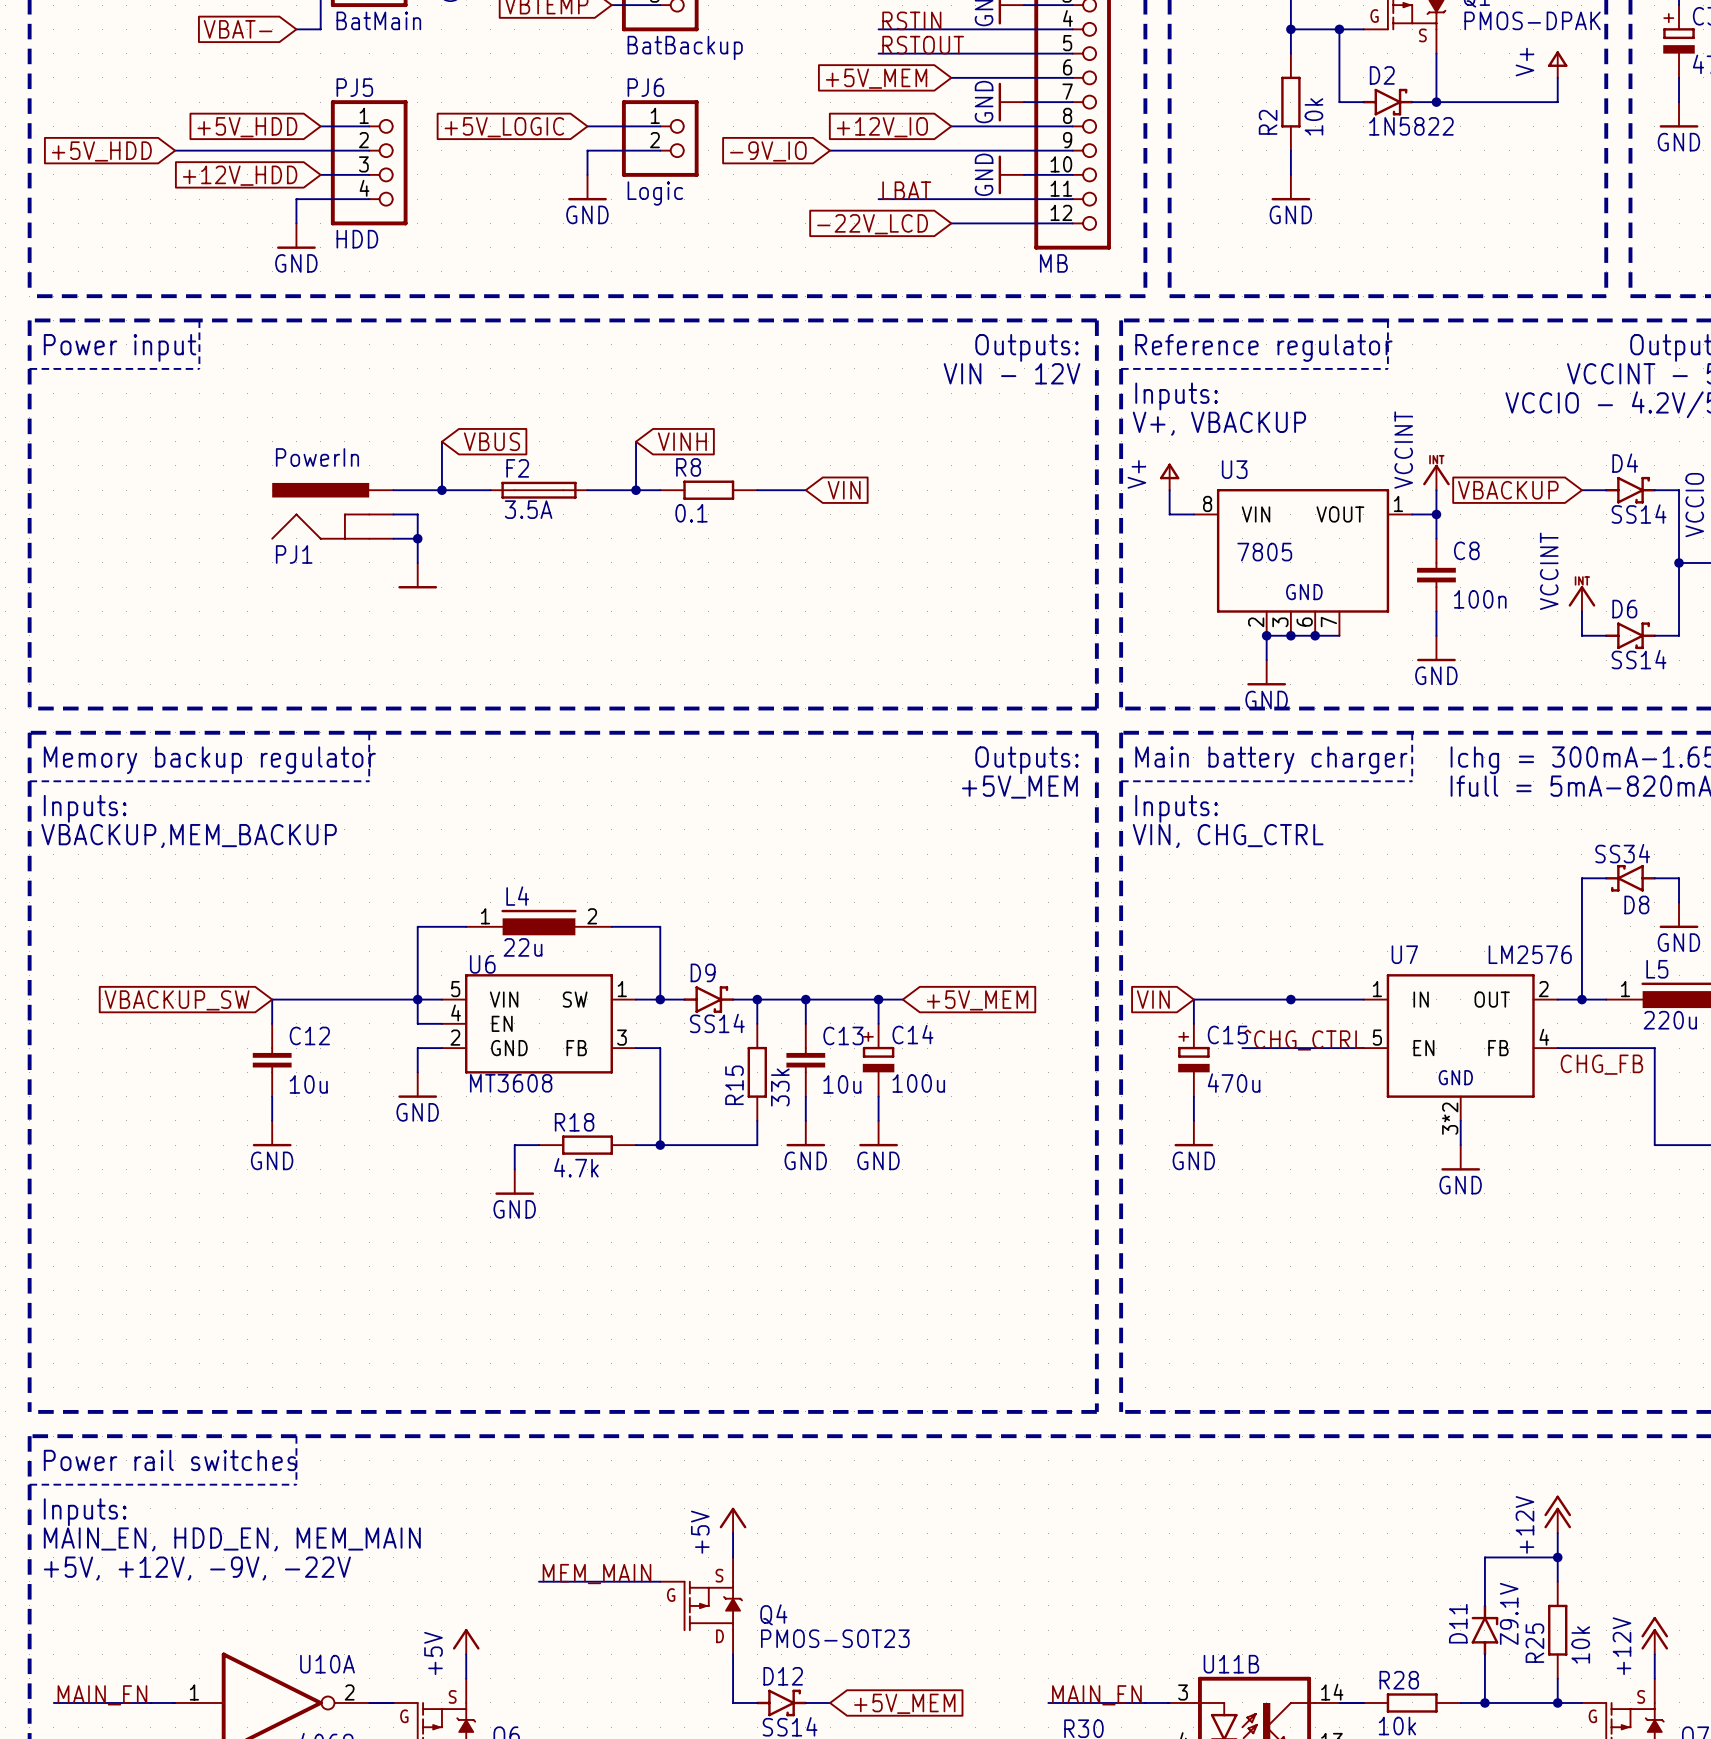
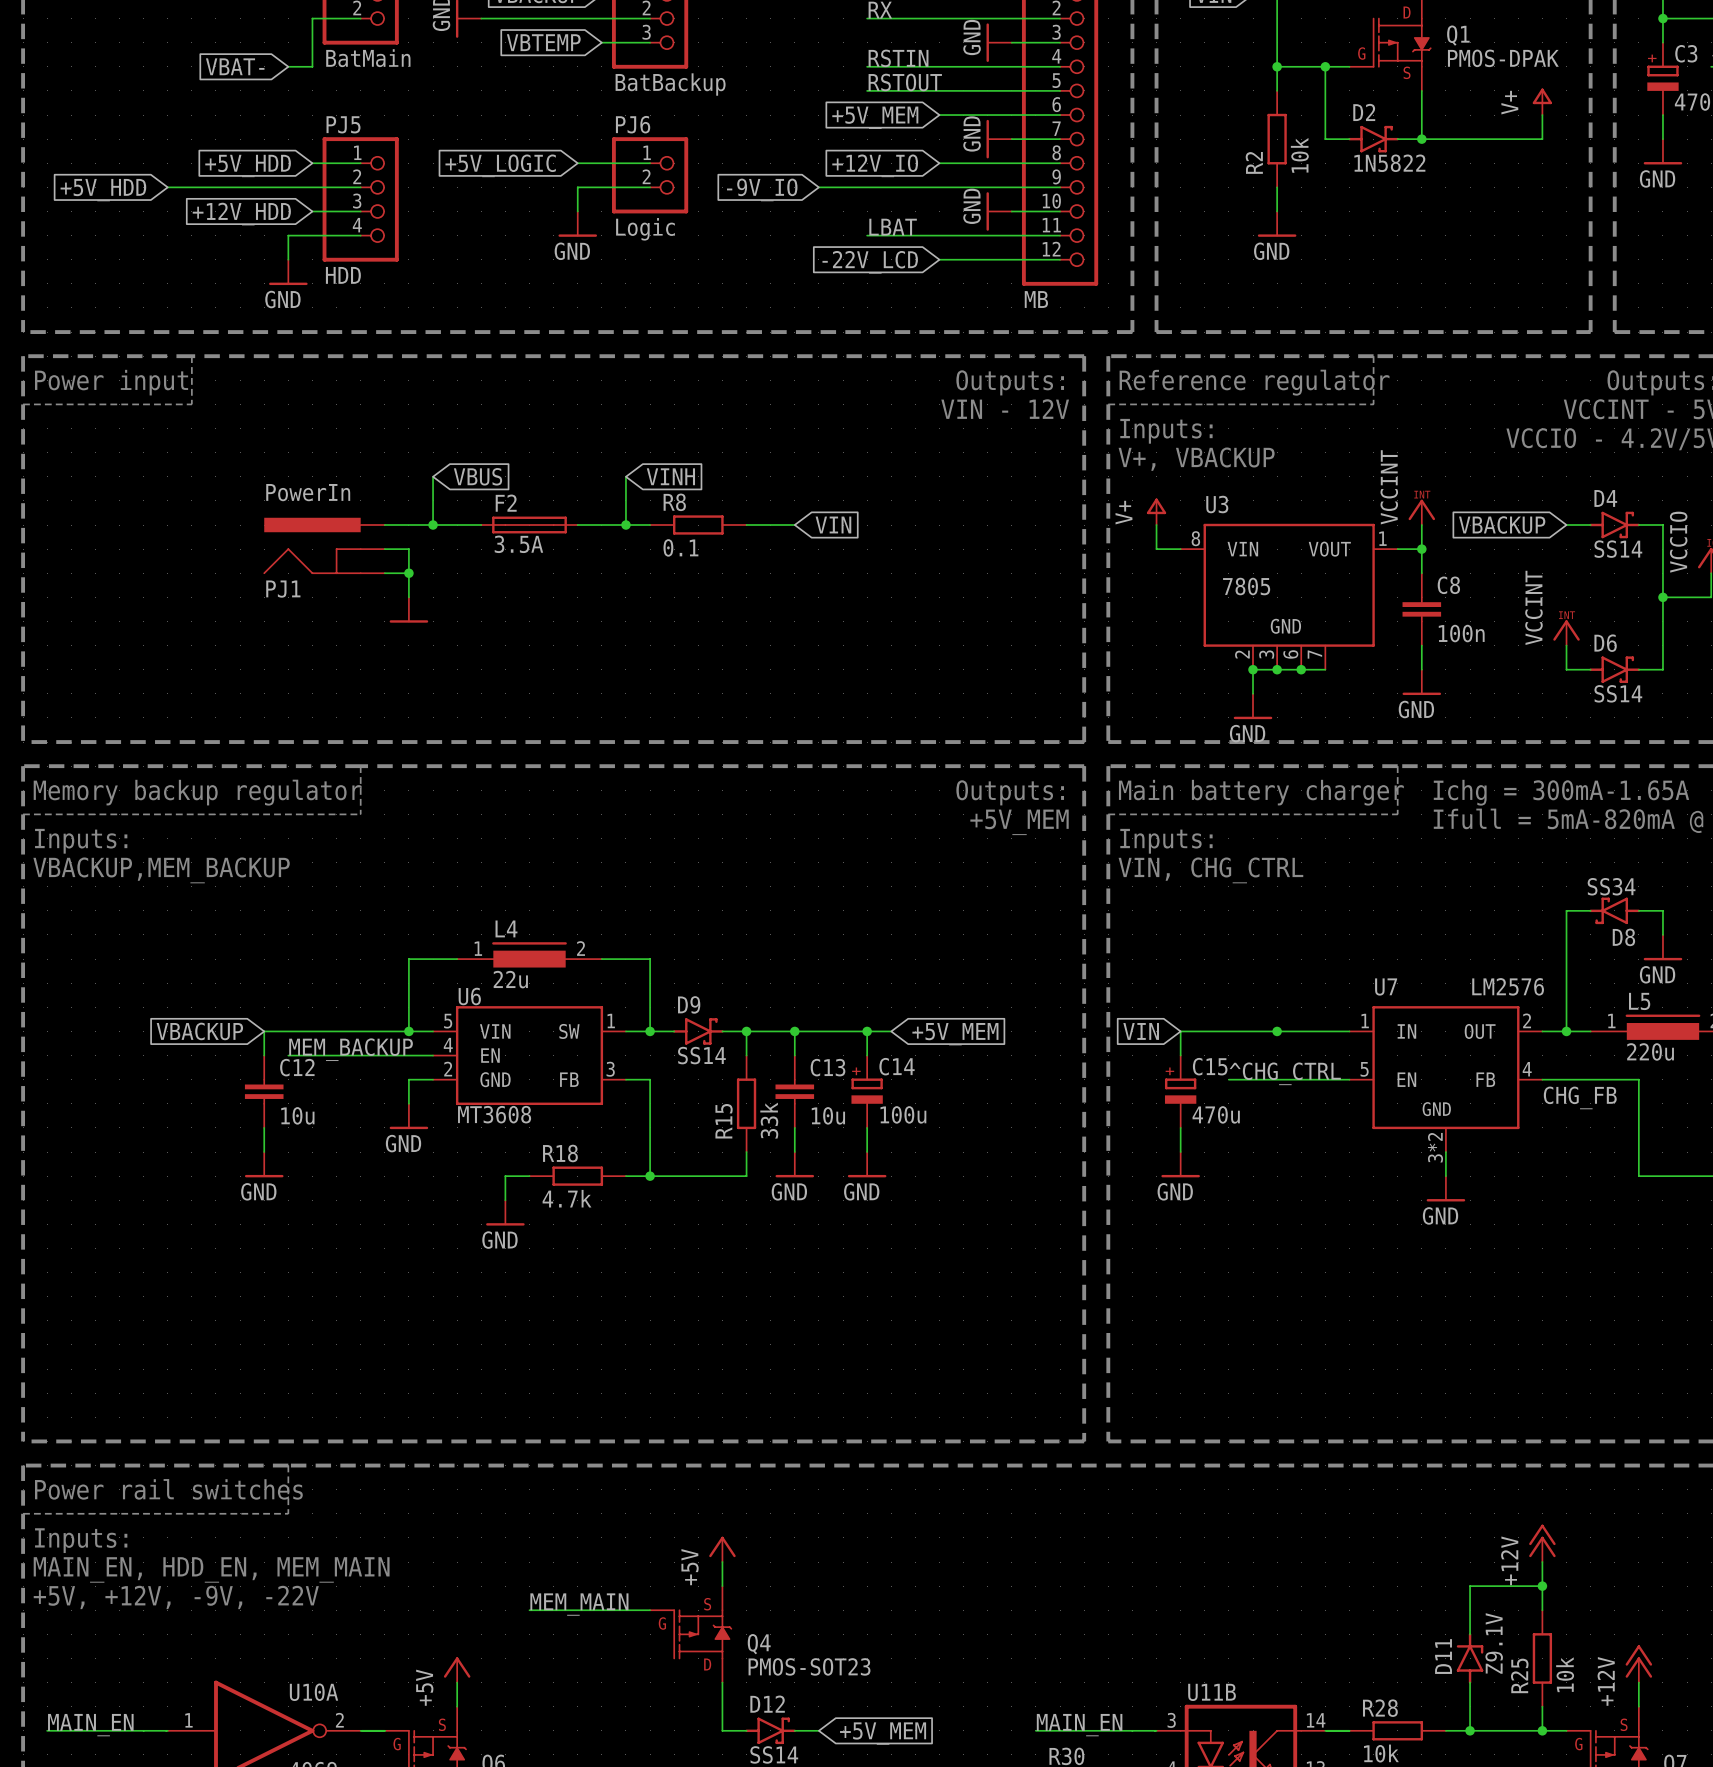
wire: (417, 999) (417, 1023) -> (288, 1055) (408, 1055)
global label: VBACKUP_SW (177, 1000) -> VBACKUP (199, 1031)
label: none -> MEM_BACKUP (351, 1049)

